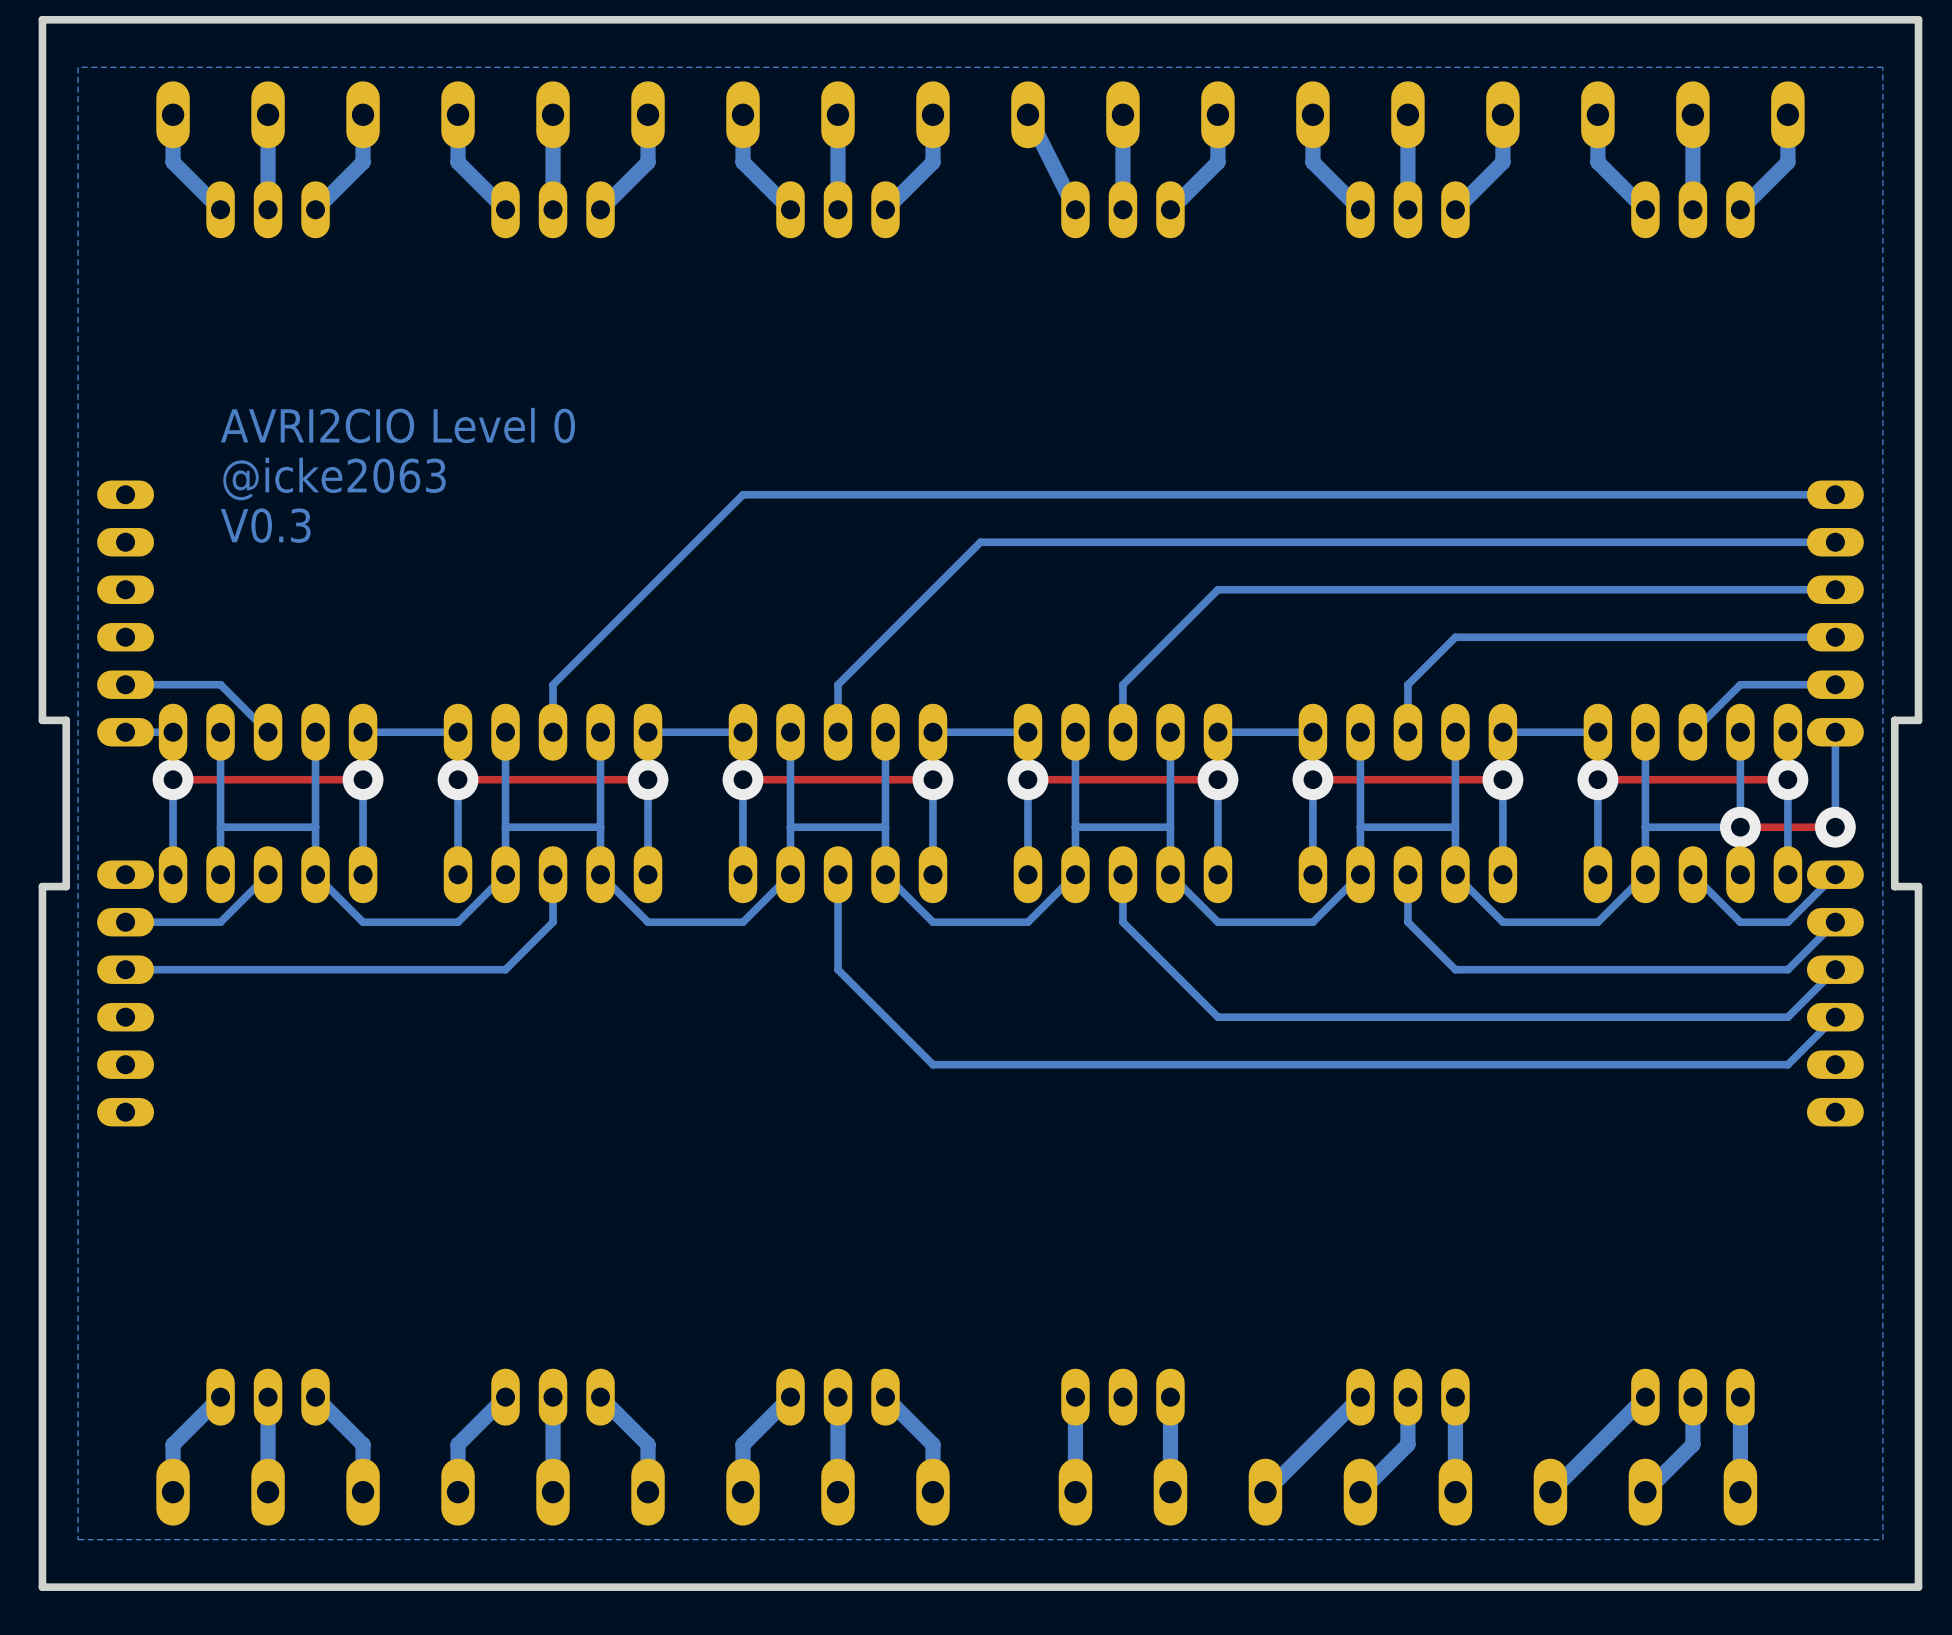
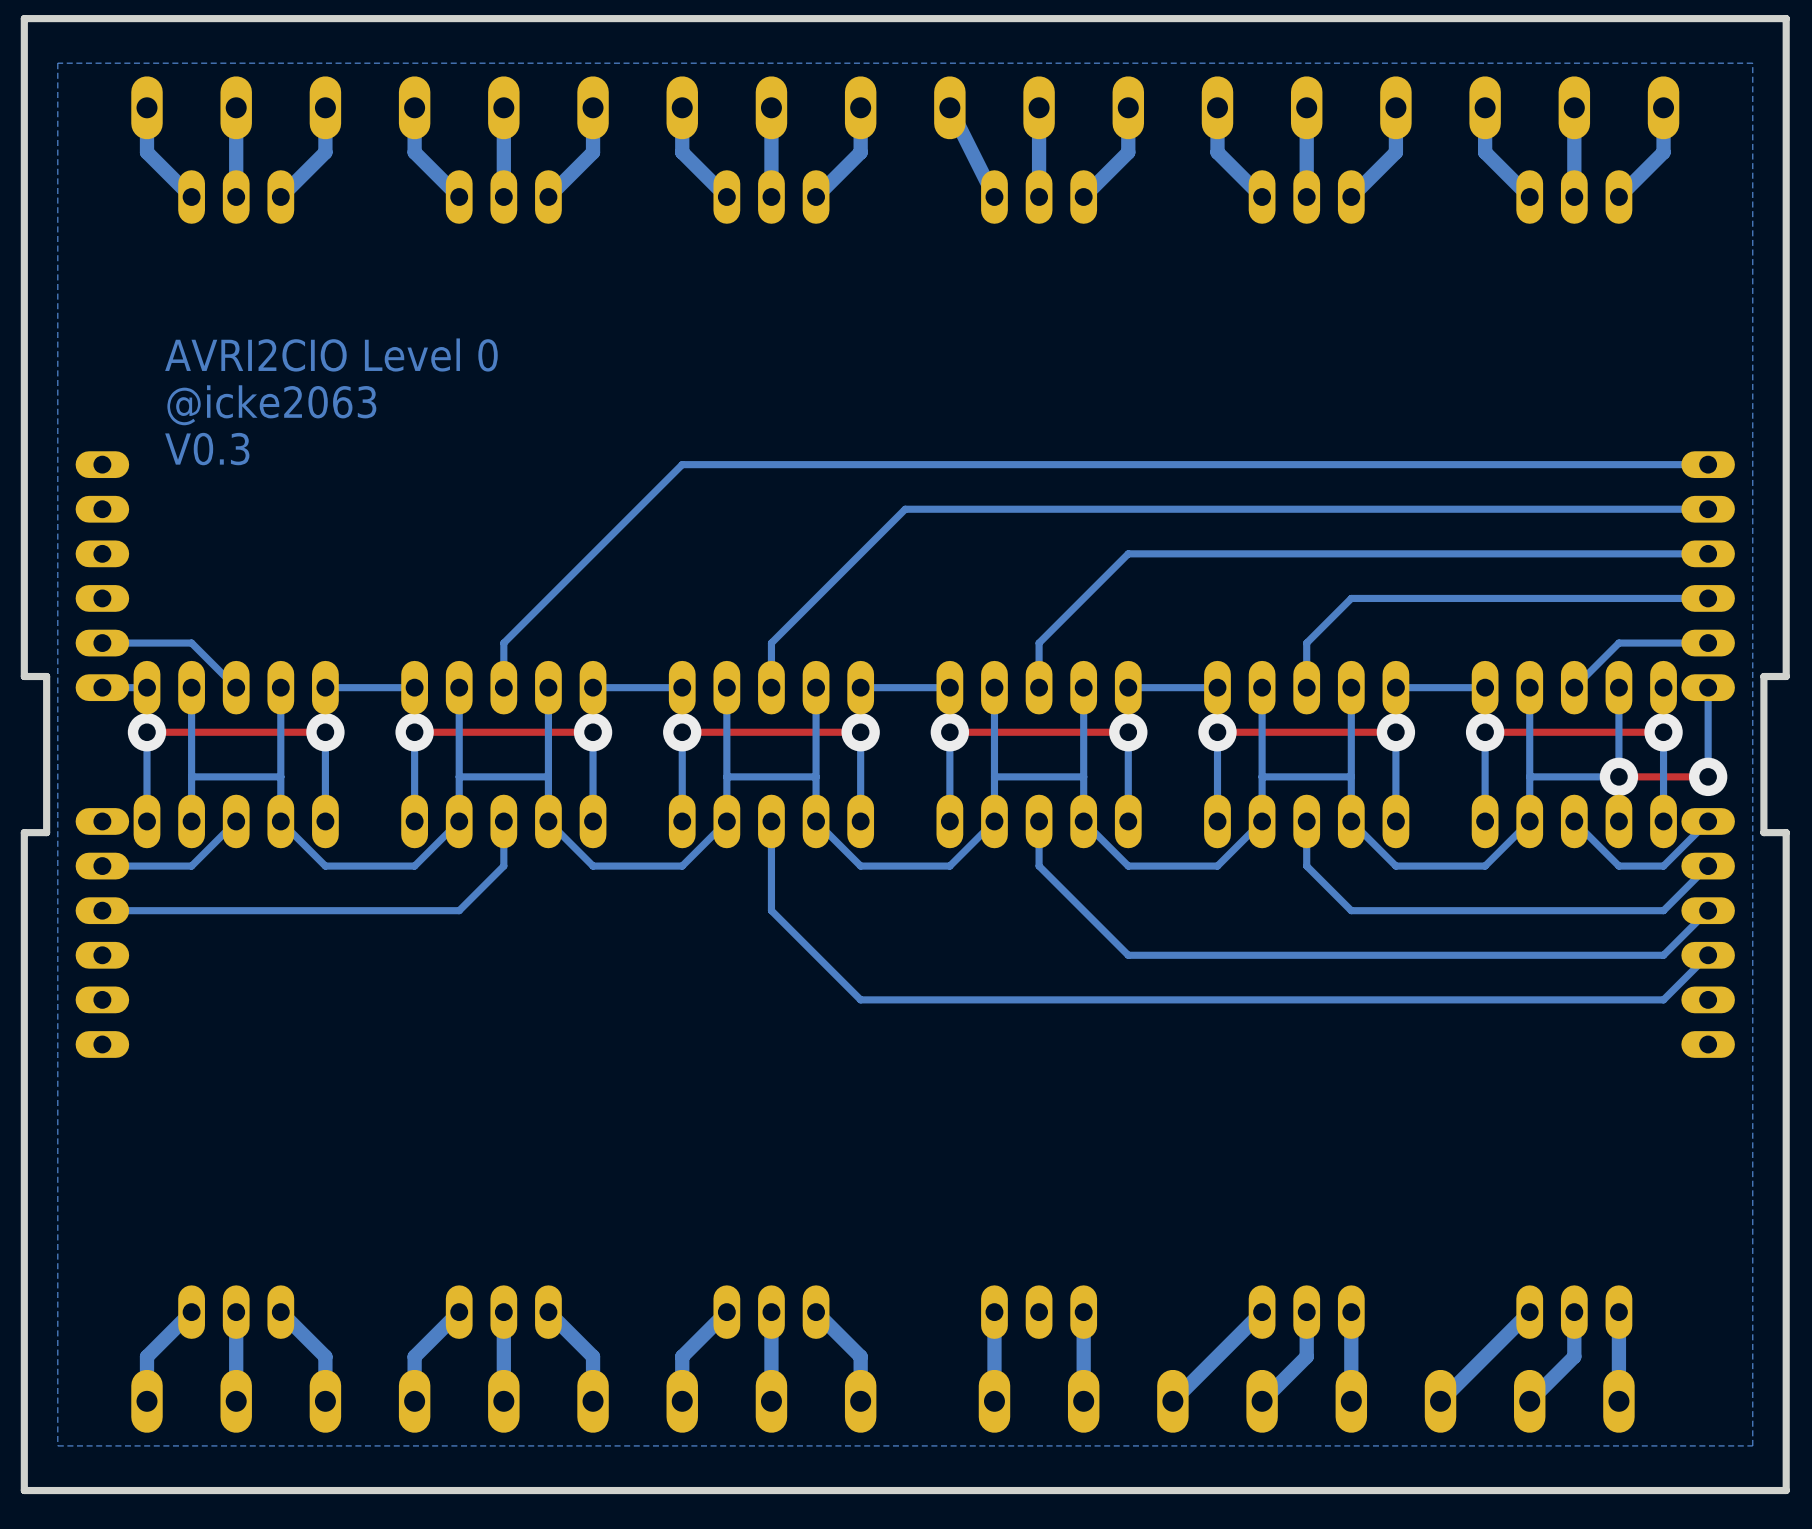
text position: AVRI2CIO Level 0 (397, 425) -> AVRI2CIO Level 0 (331, 355)
text position: @icke2063 (334, 479) -> @icke2063 (271, 405)
text position: V0.3 (265, 525) -> V0.3 (207, 449)

